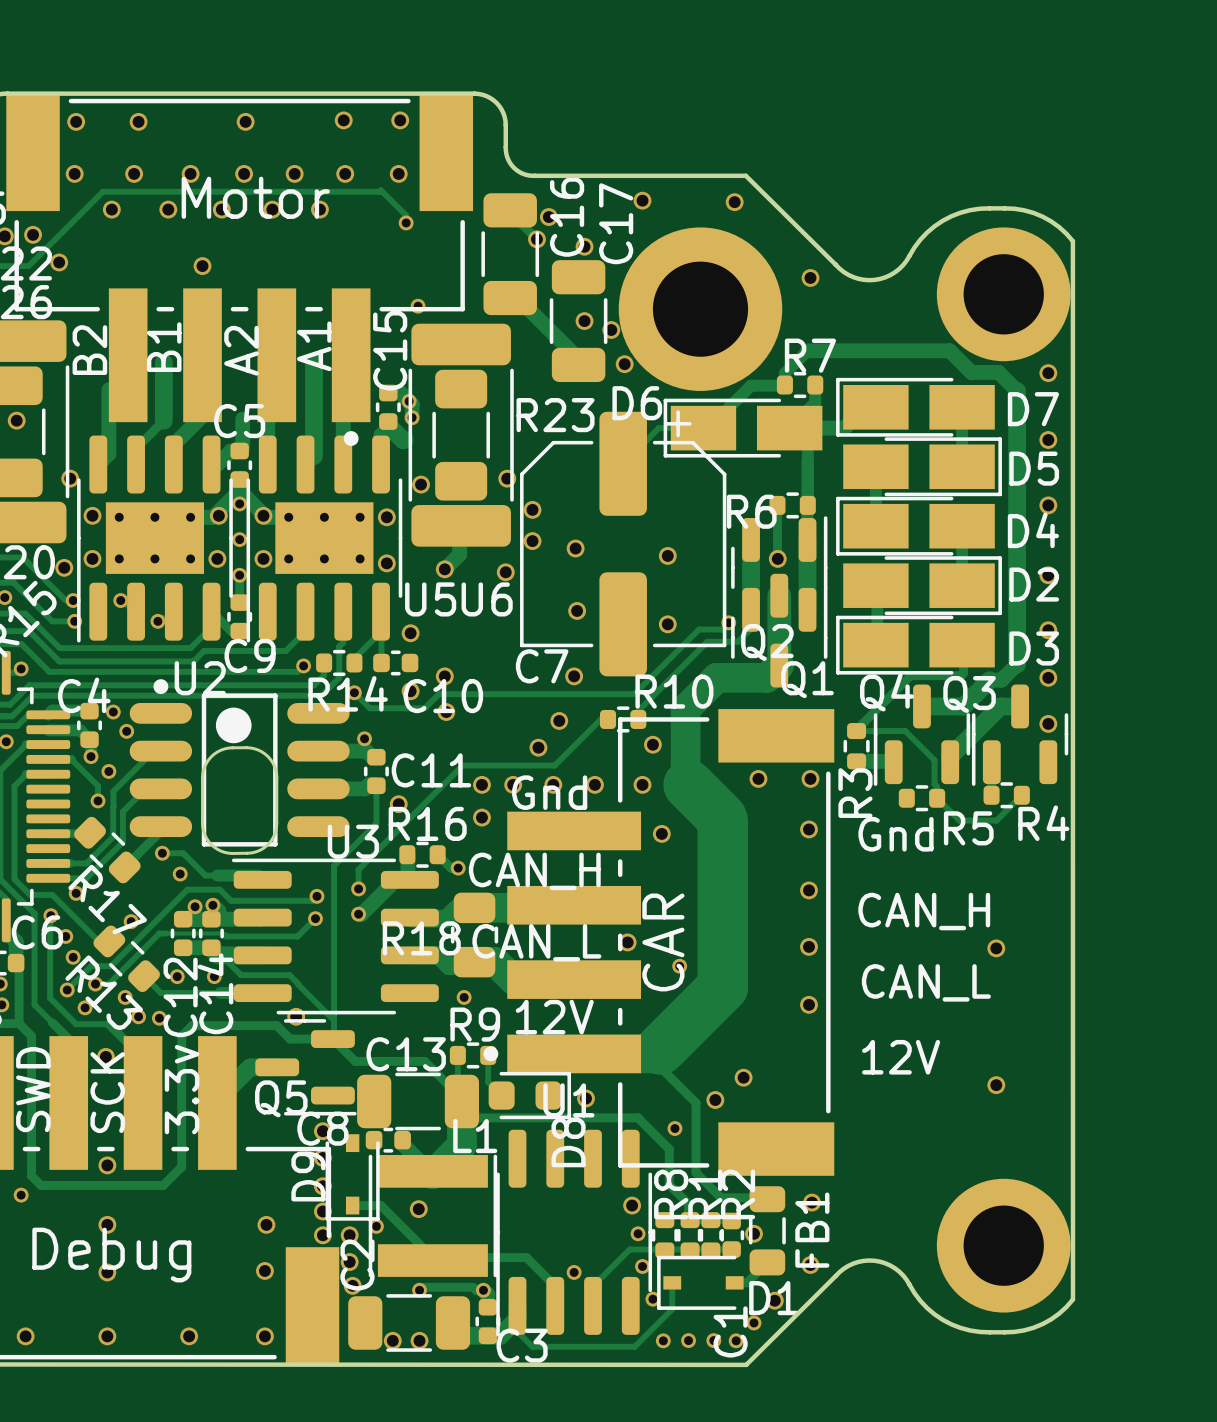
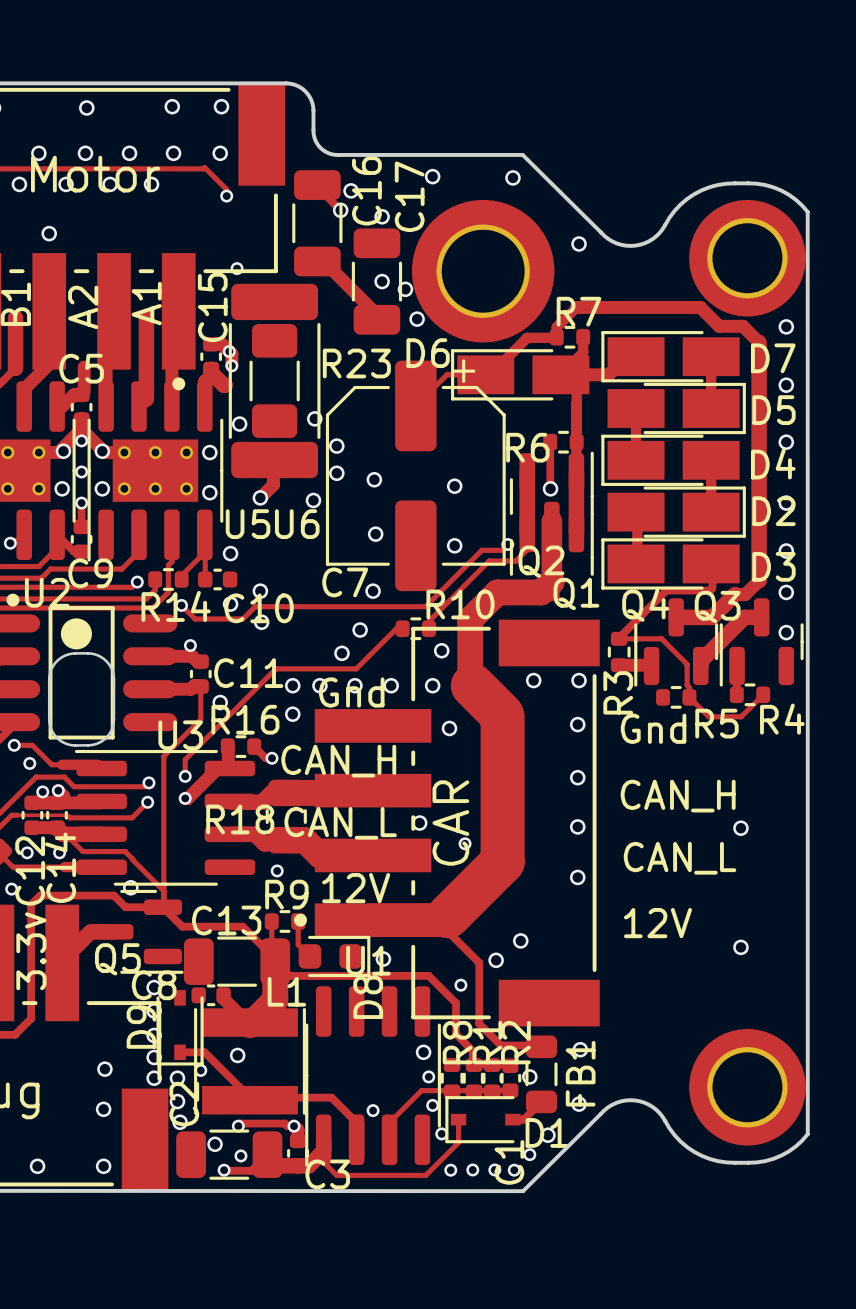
via: none -> (215, 1144)
track: none -> (267, 1154) (251, 1170) (224, 1170)
via: none -> (240, 1155)
via: (392, 1340) -> none
via: none -> (224, 1170)
via: (419, 1340) -> none

